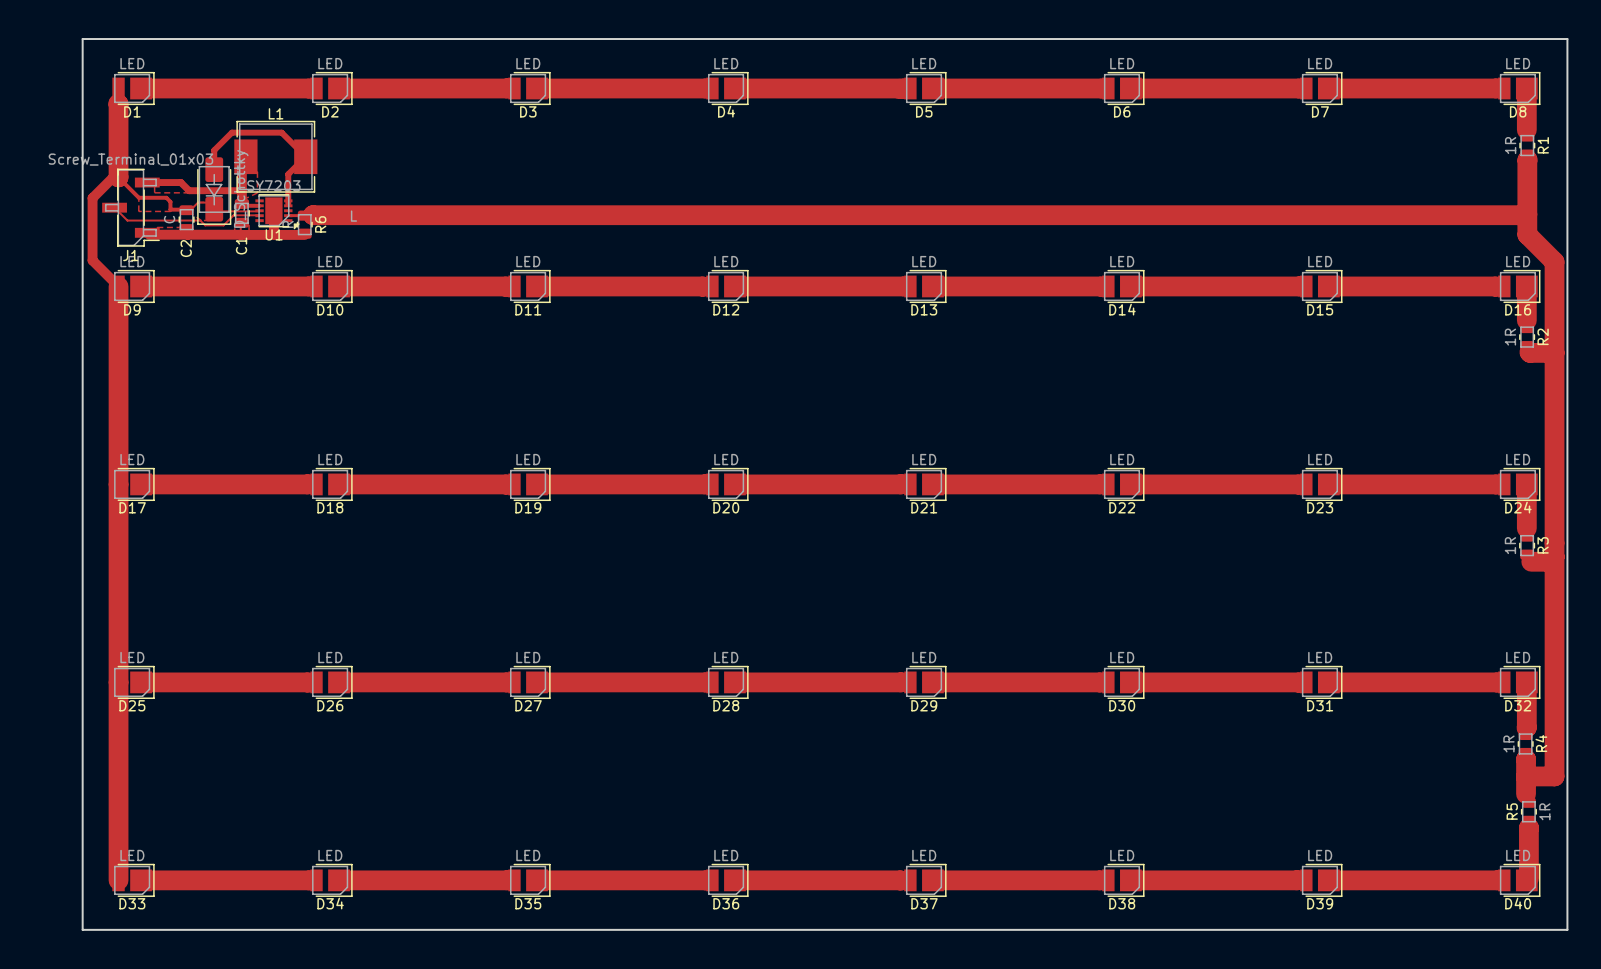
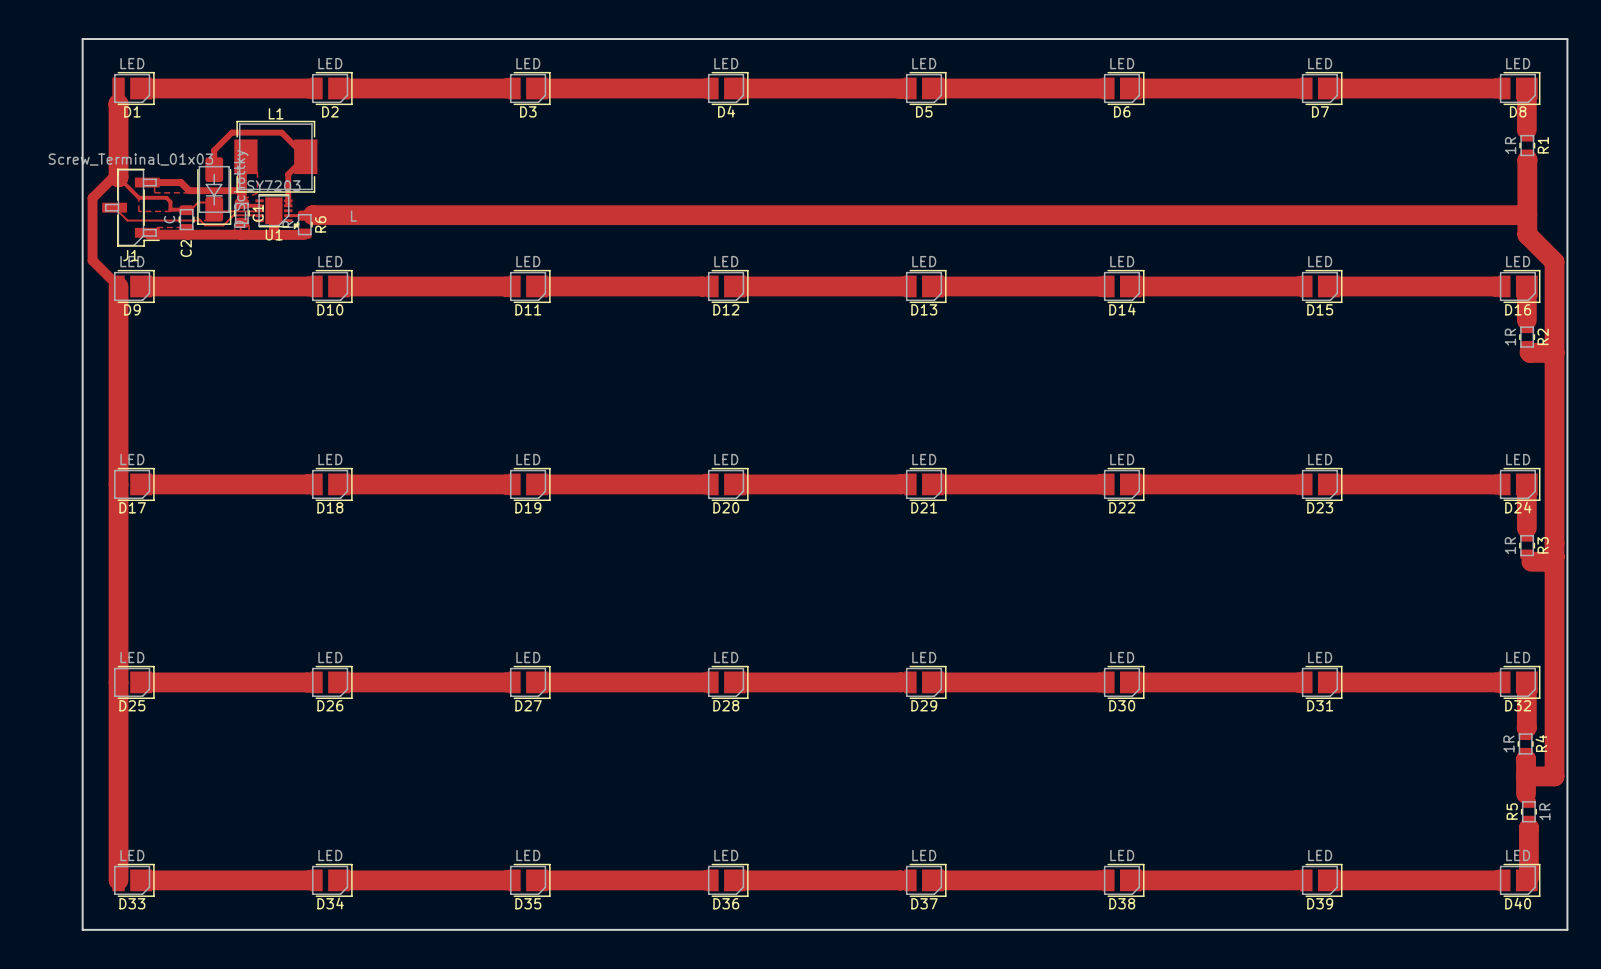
C1 name position: C1 (241, 246) -> C1 (258, 213)

